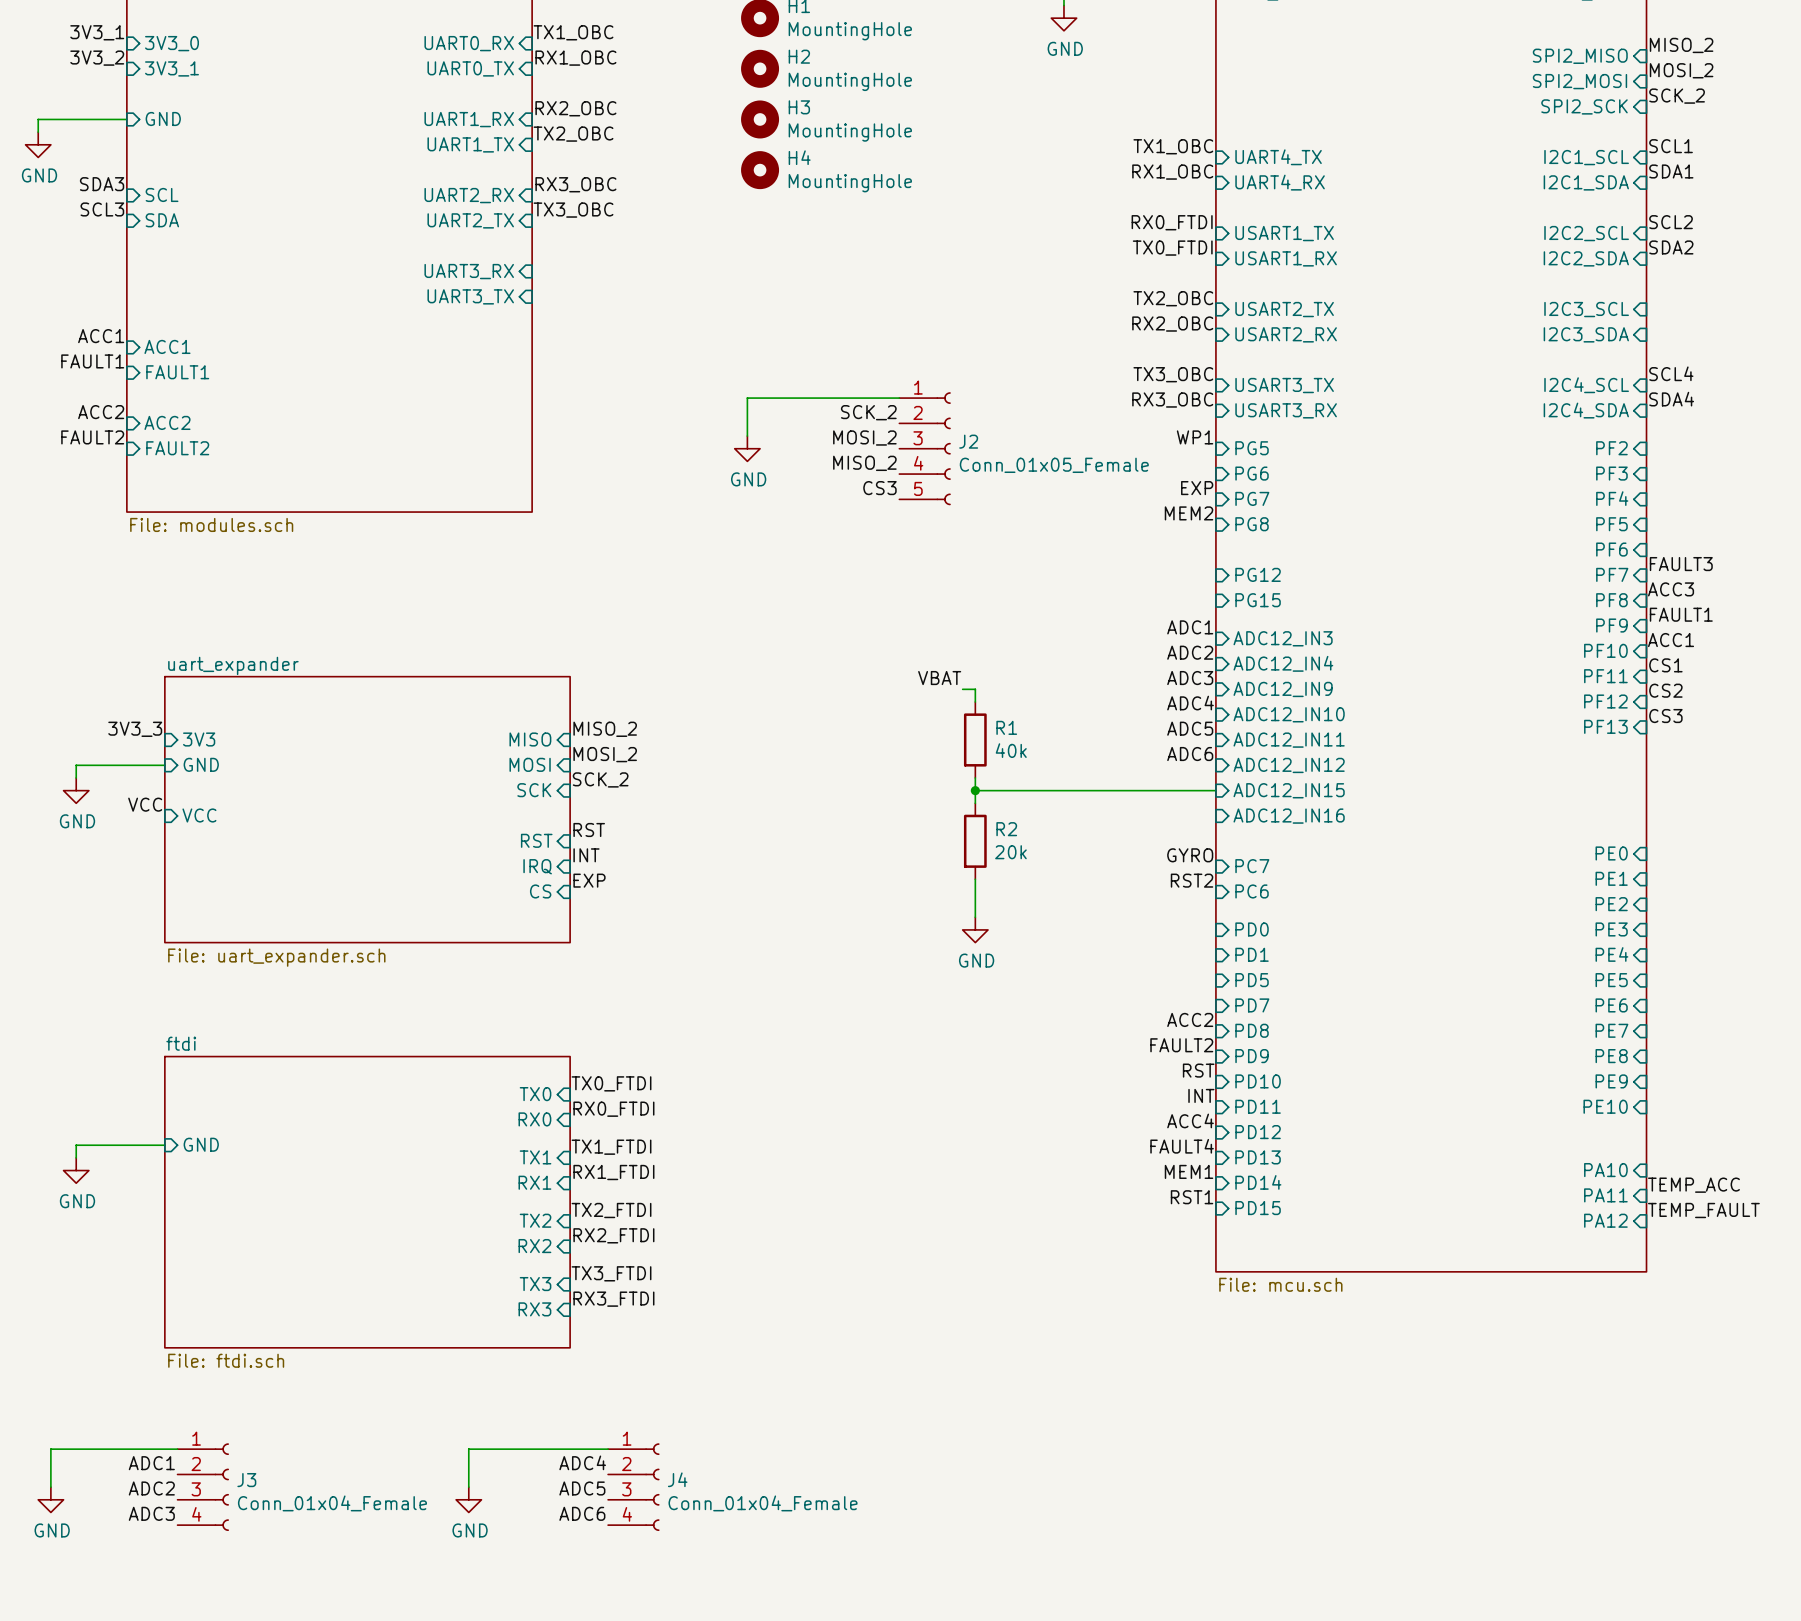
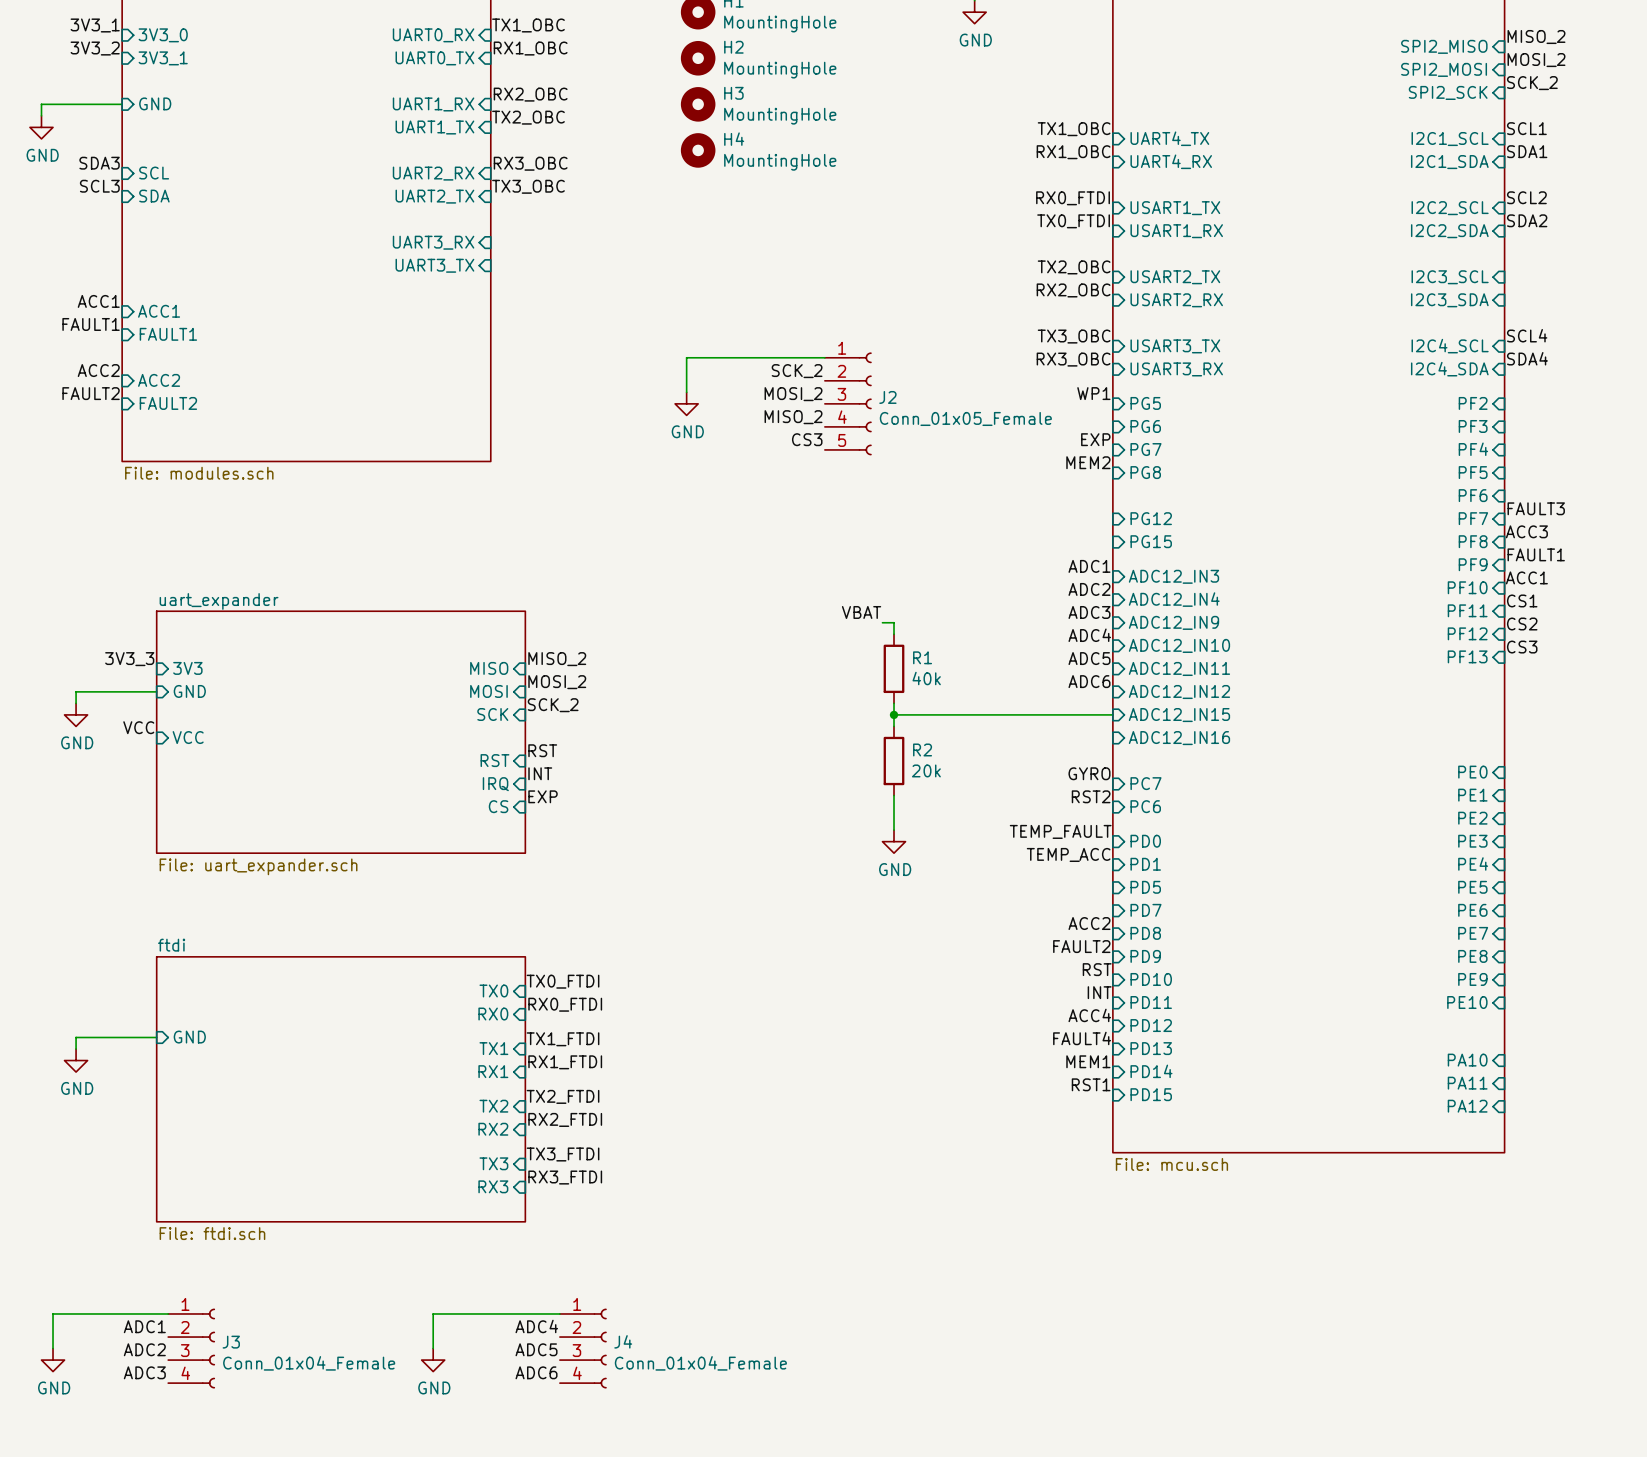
label: none -> TEMP_FAULT (1060, 831)
label: none -> TEMP_ACC (1068, 854)
label: TEMP_ACC (1693, 1185) -> none
label: TEMP_FAULT (1703, 1210) -> none

